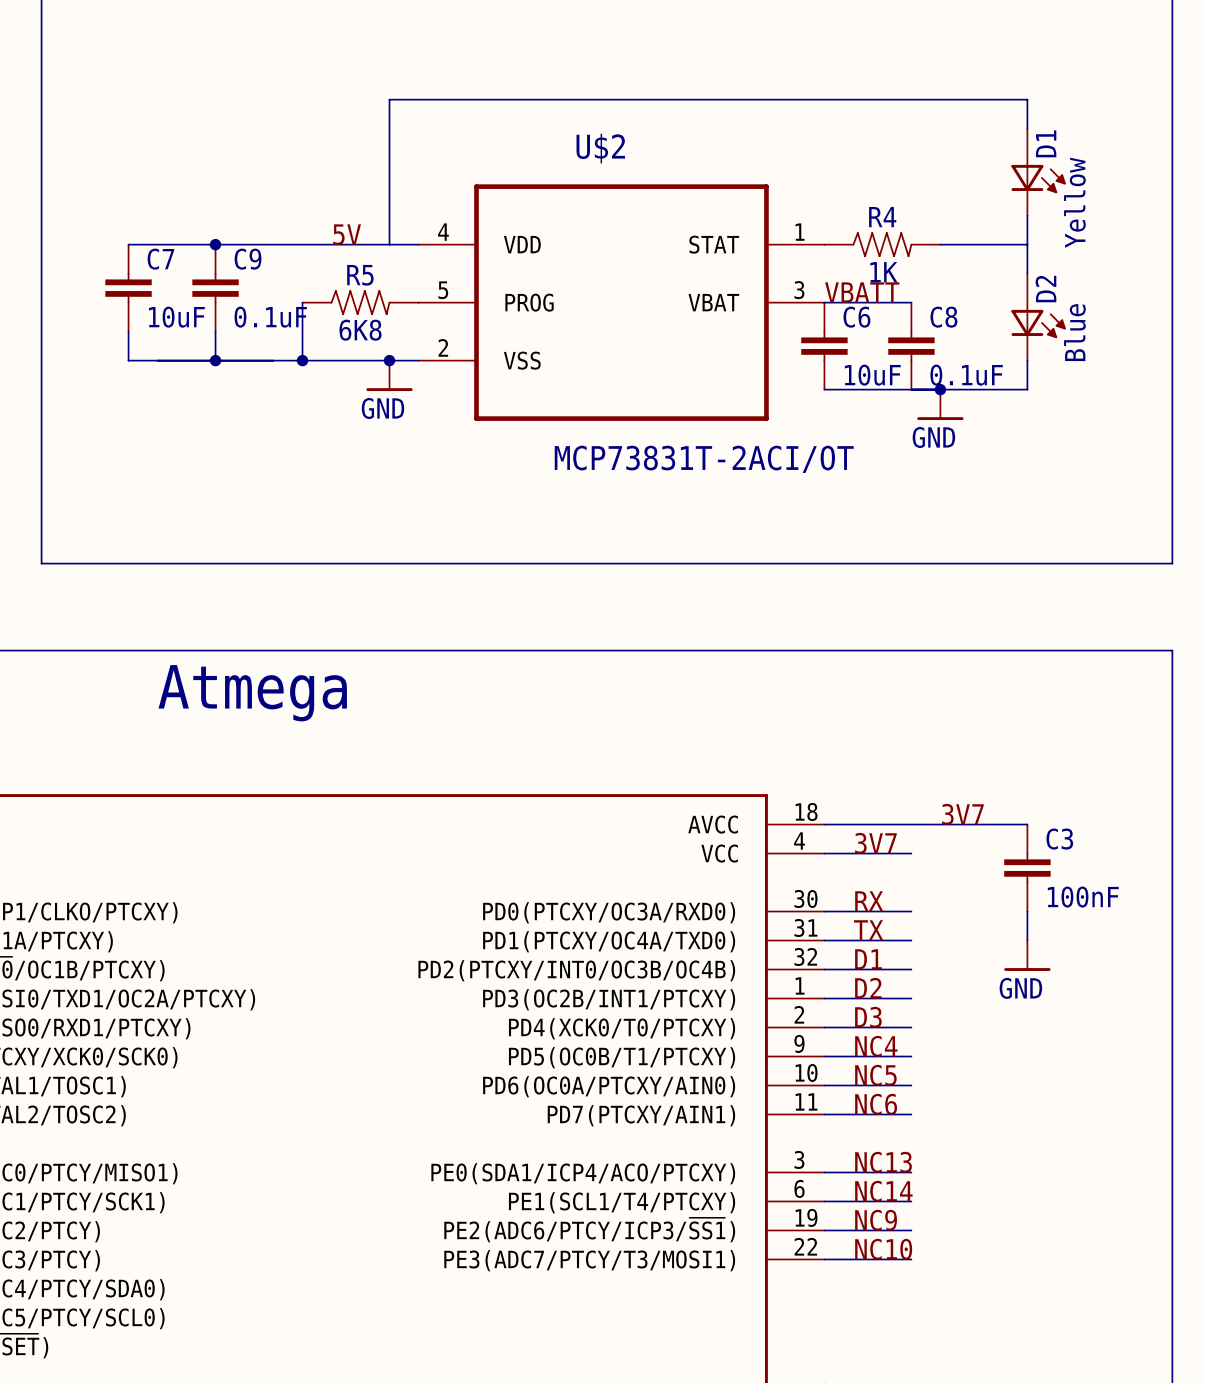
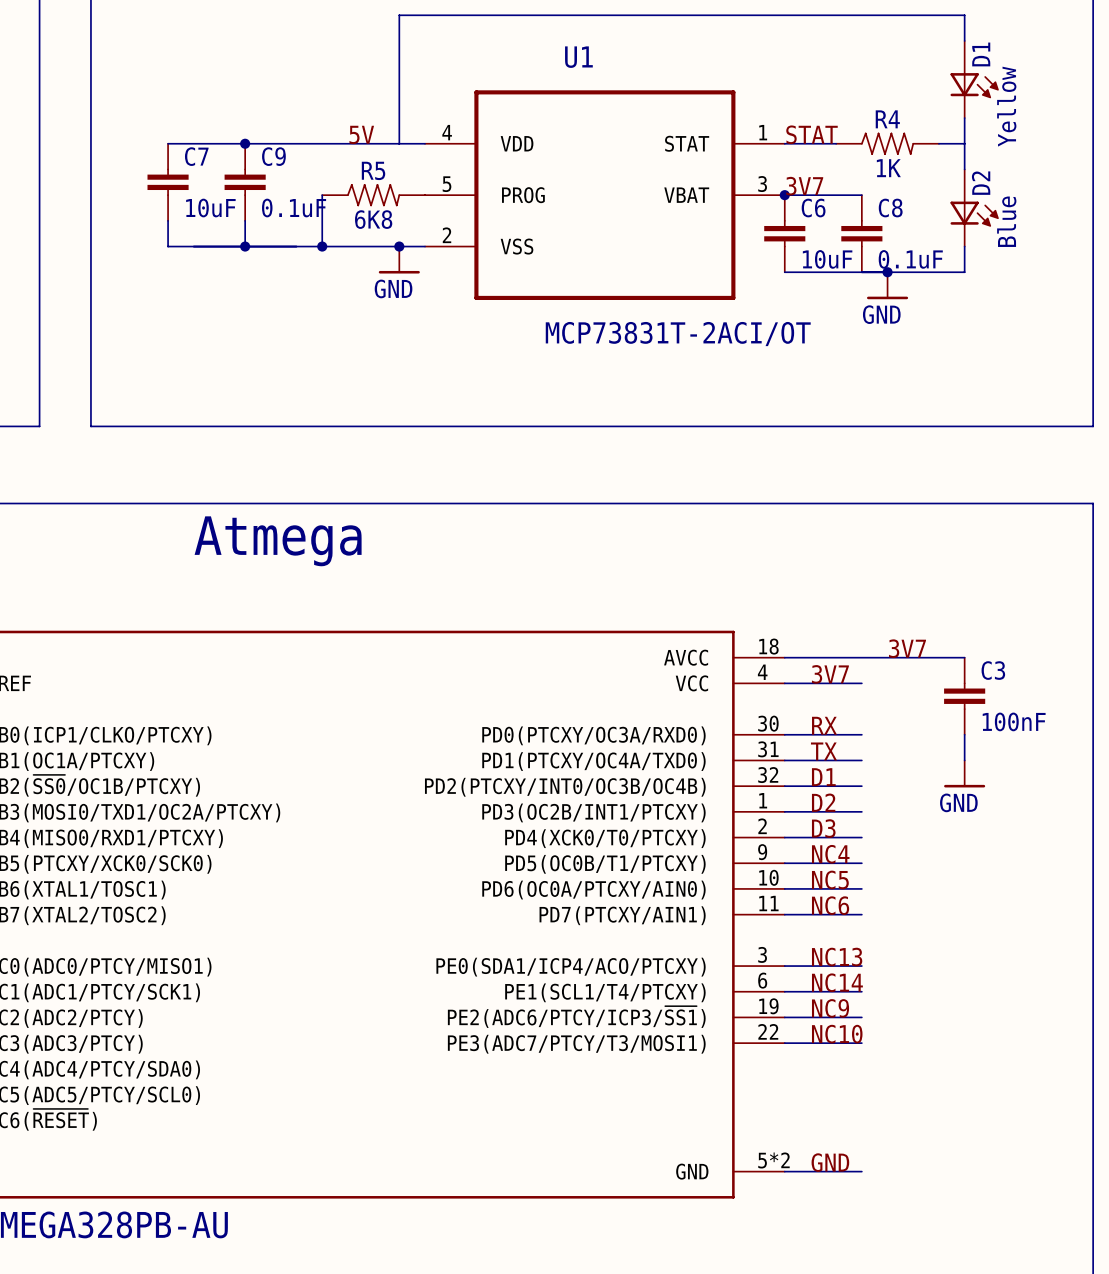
U$2 name: U$2 (600, 148) -> U1 (578, 57)
label: none -> STAT (812, 134)
R4 position: (882, 244) -> (887, 143)
label: VBATT (862, 292) -> 3V7 (804, 186)
junction: none -> (784, 195)

